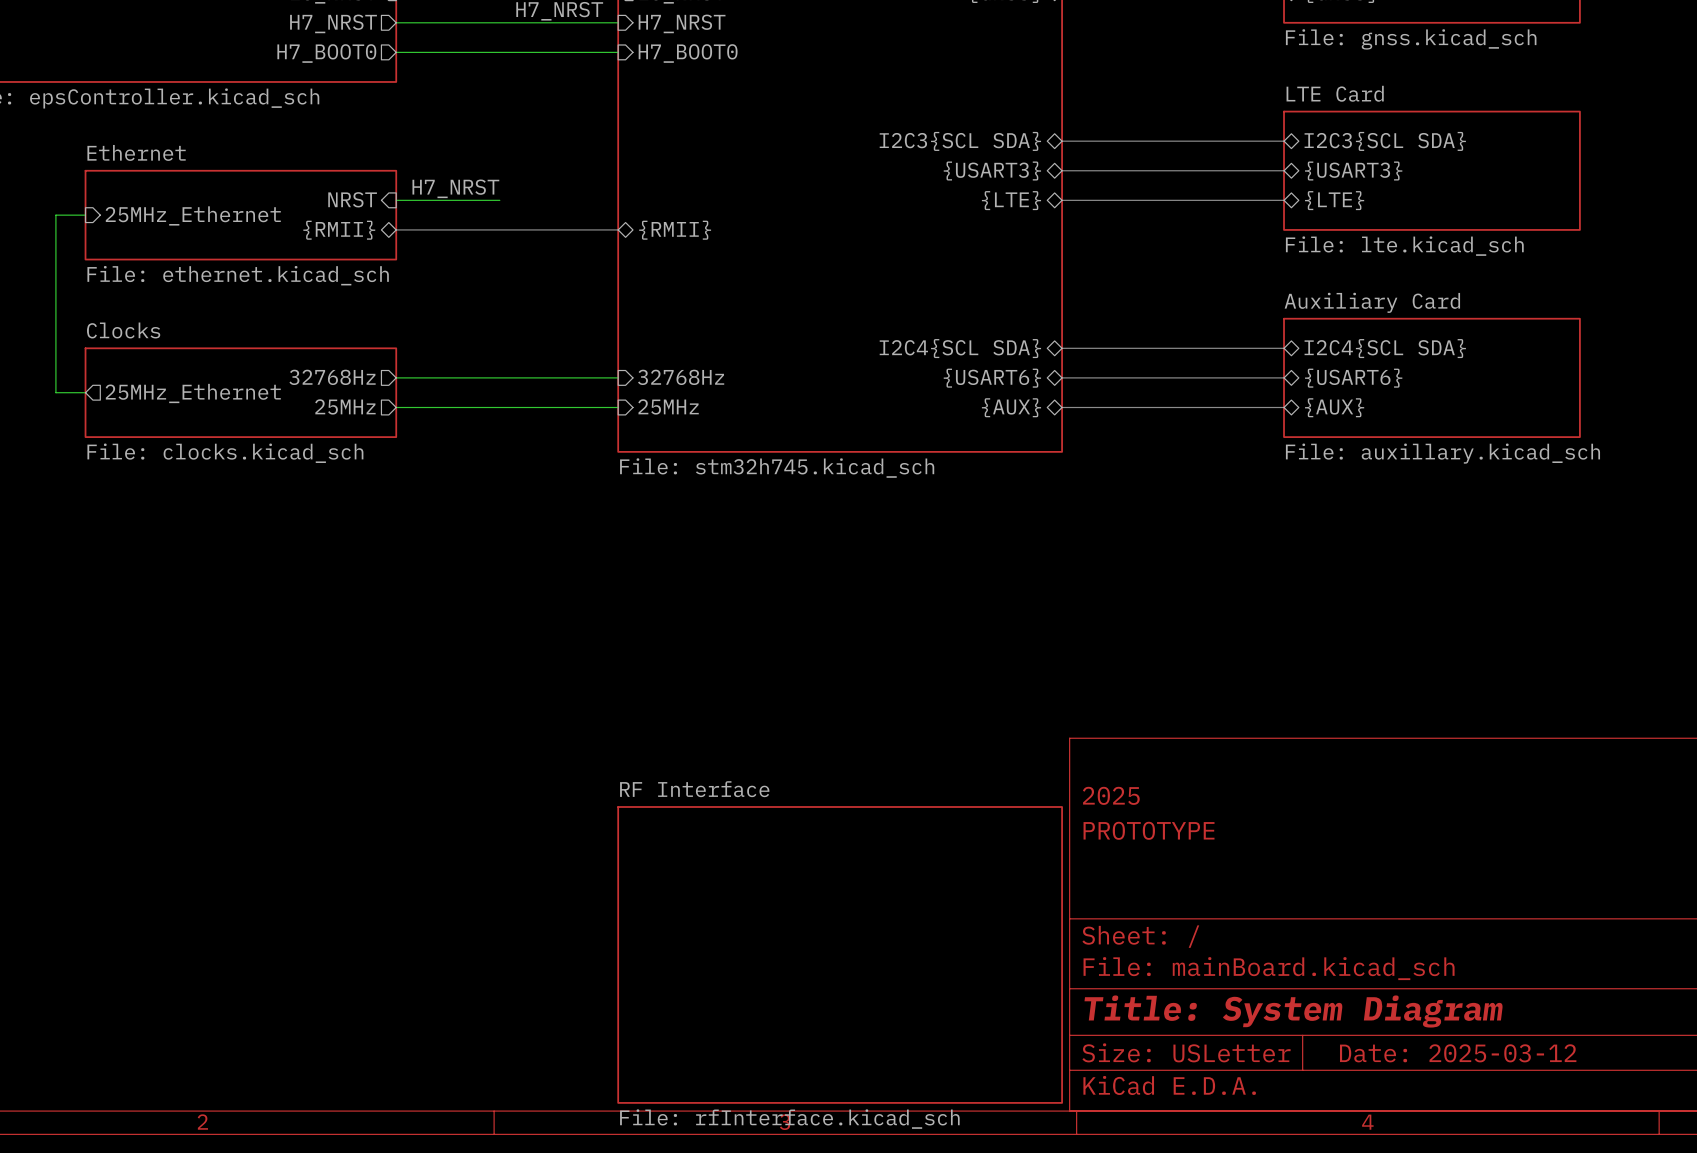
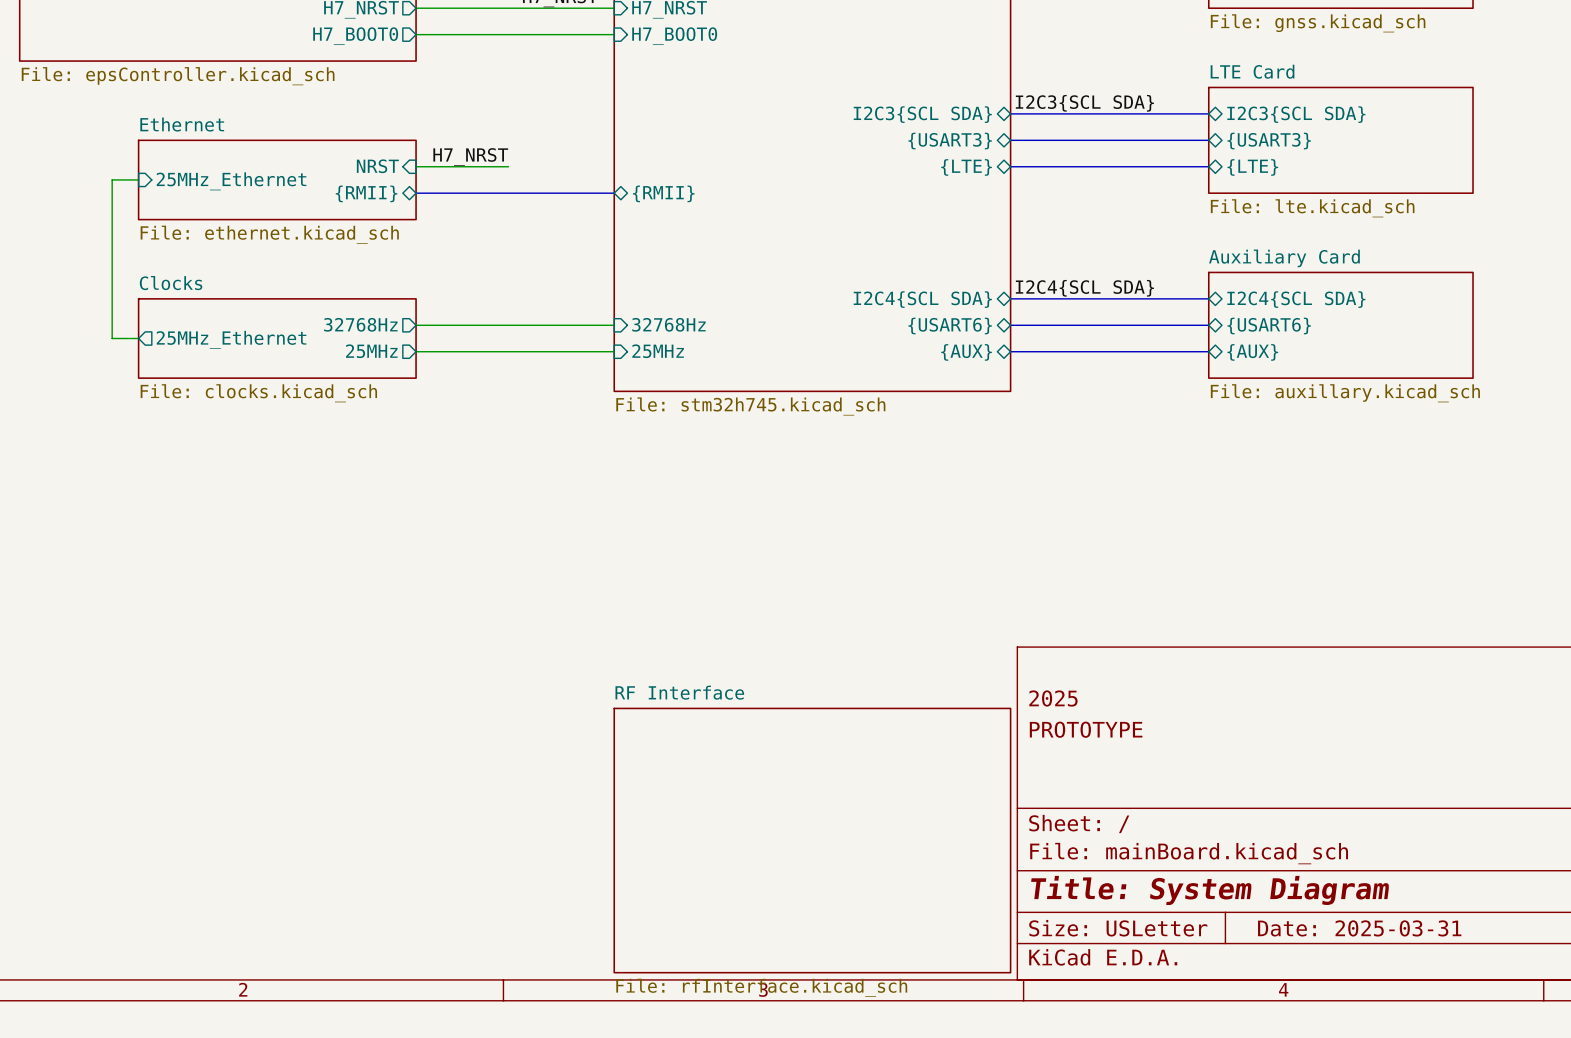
label: none -> I2C3{SCL SDA} (1084, 103)
label: none -> I2C4{SCL SDA} (1084, 288)
title block: Date: 2025-03-12 (1458, 1053) -> Date: 2025-03-31 (1359, 928)

